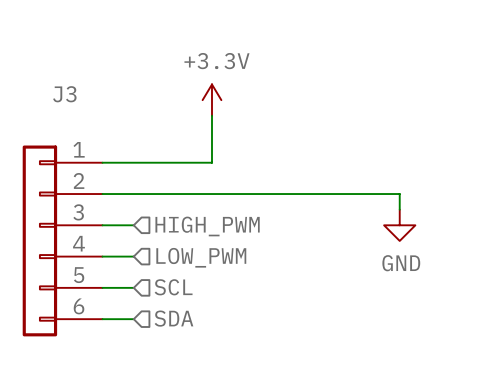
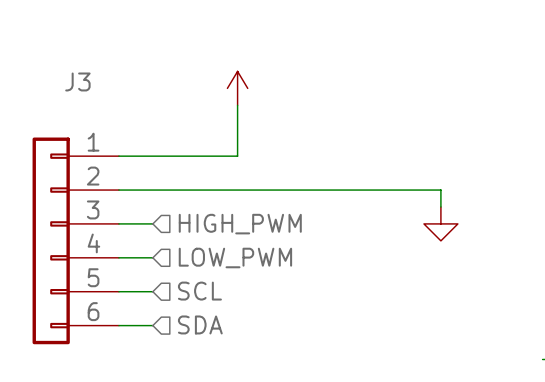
power symbol text: +3.3V (216, 61) -> none
power symbol text: GND (401, 263) -> none

